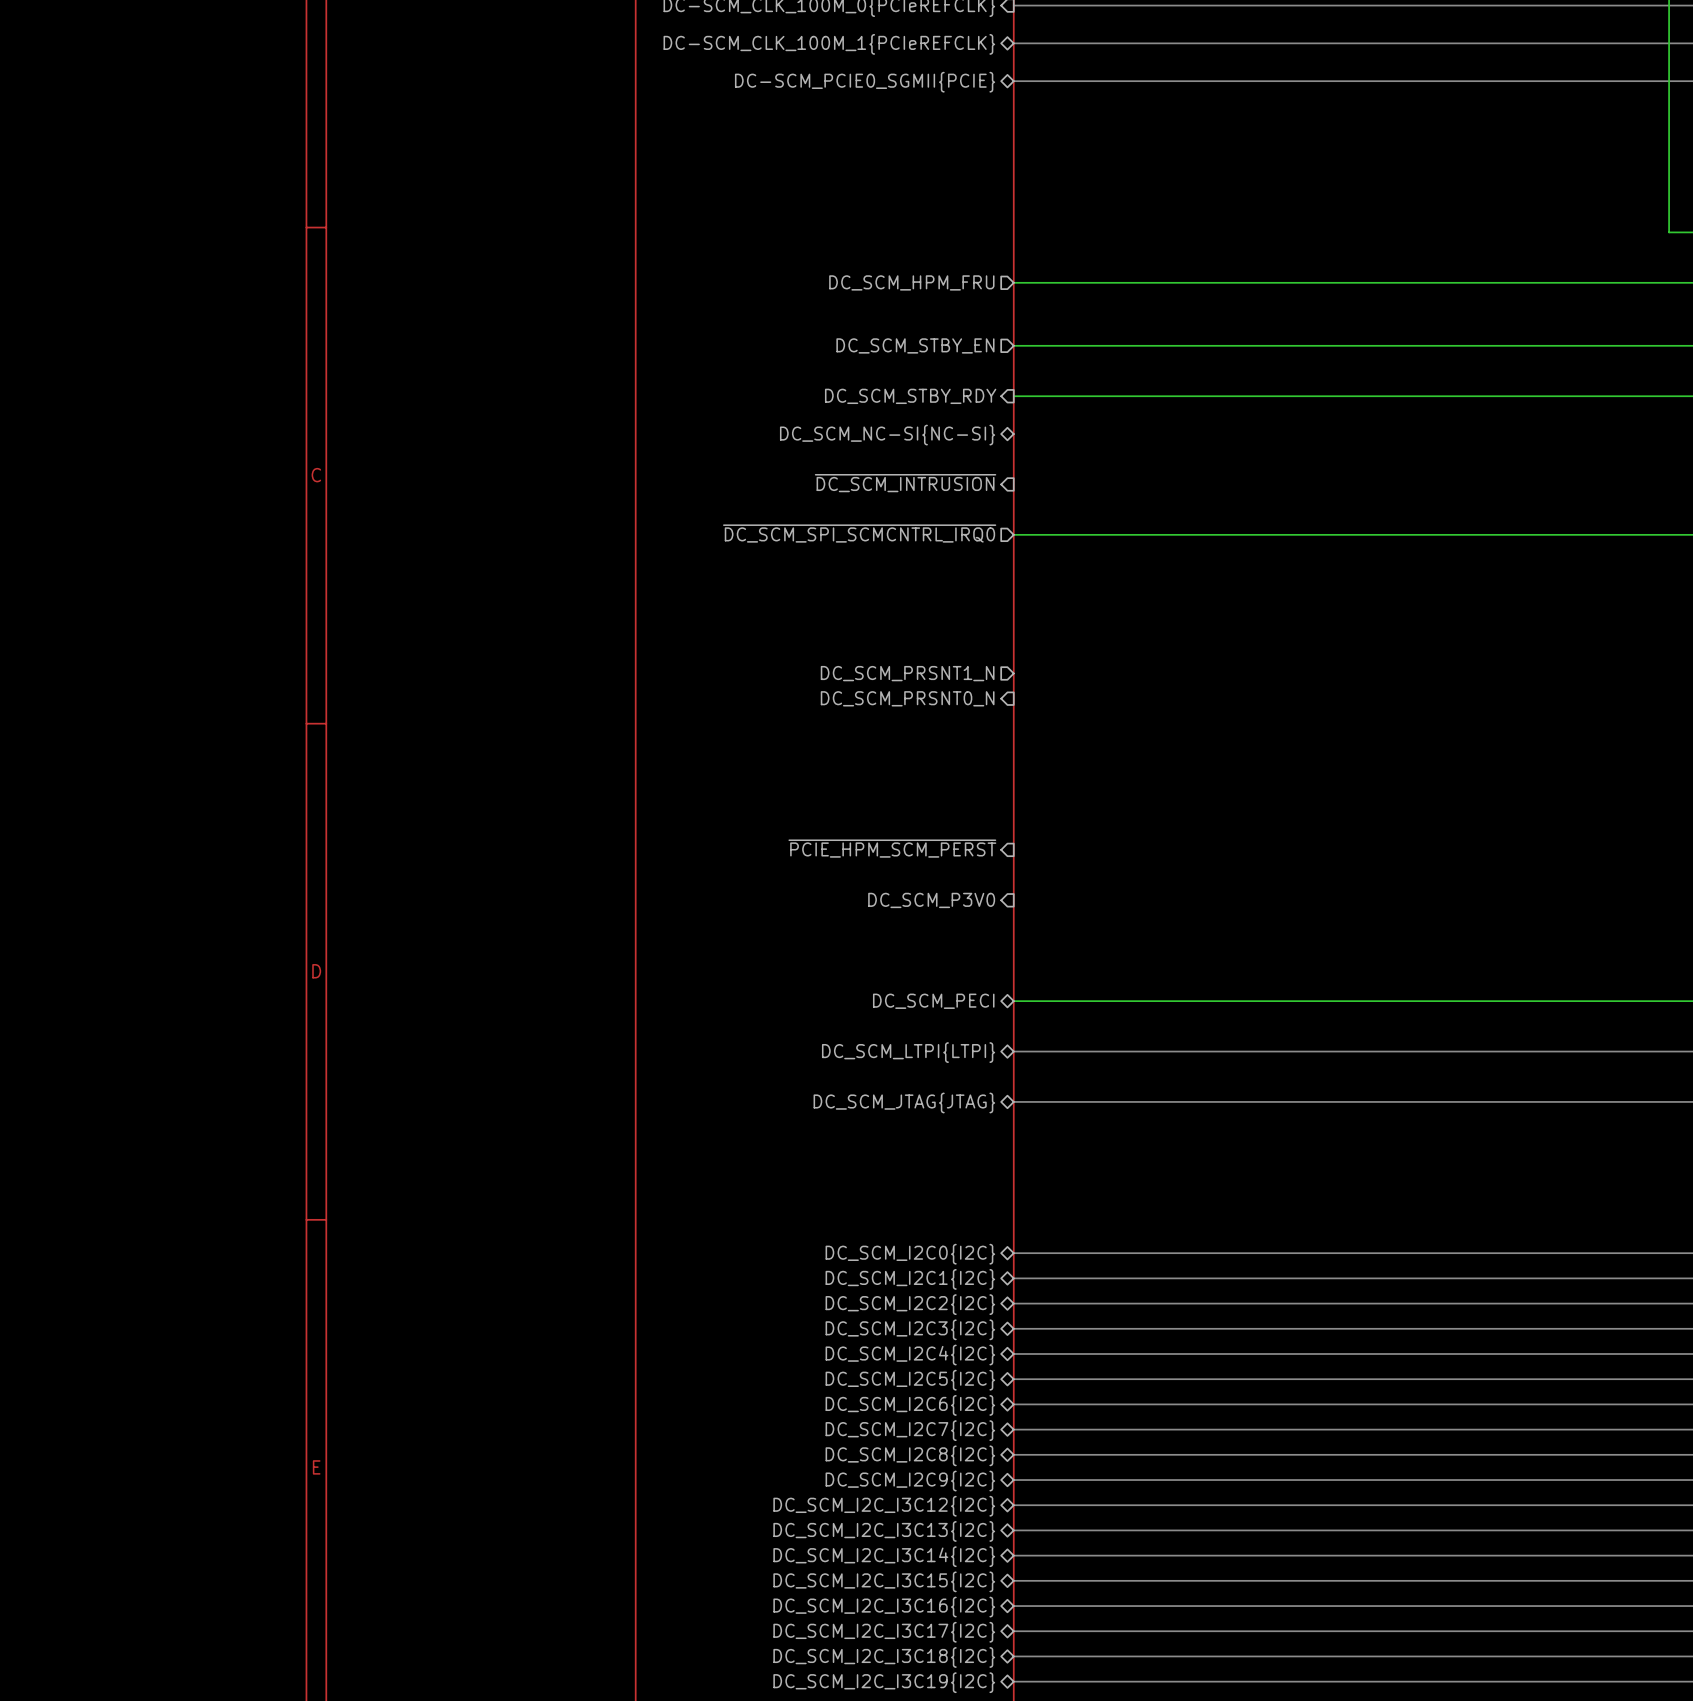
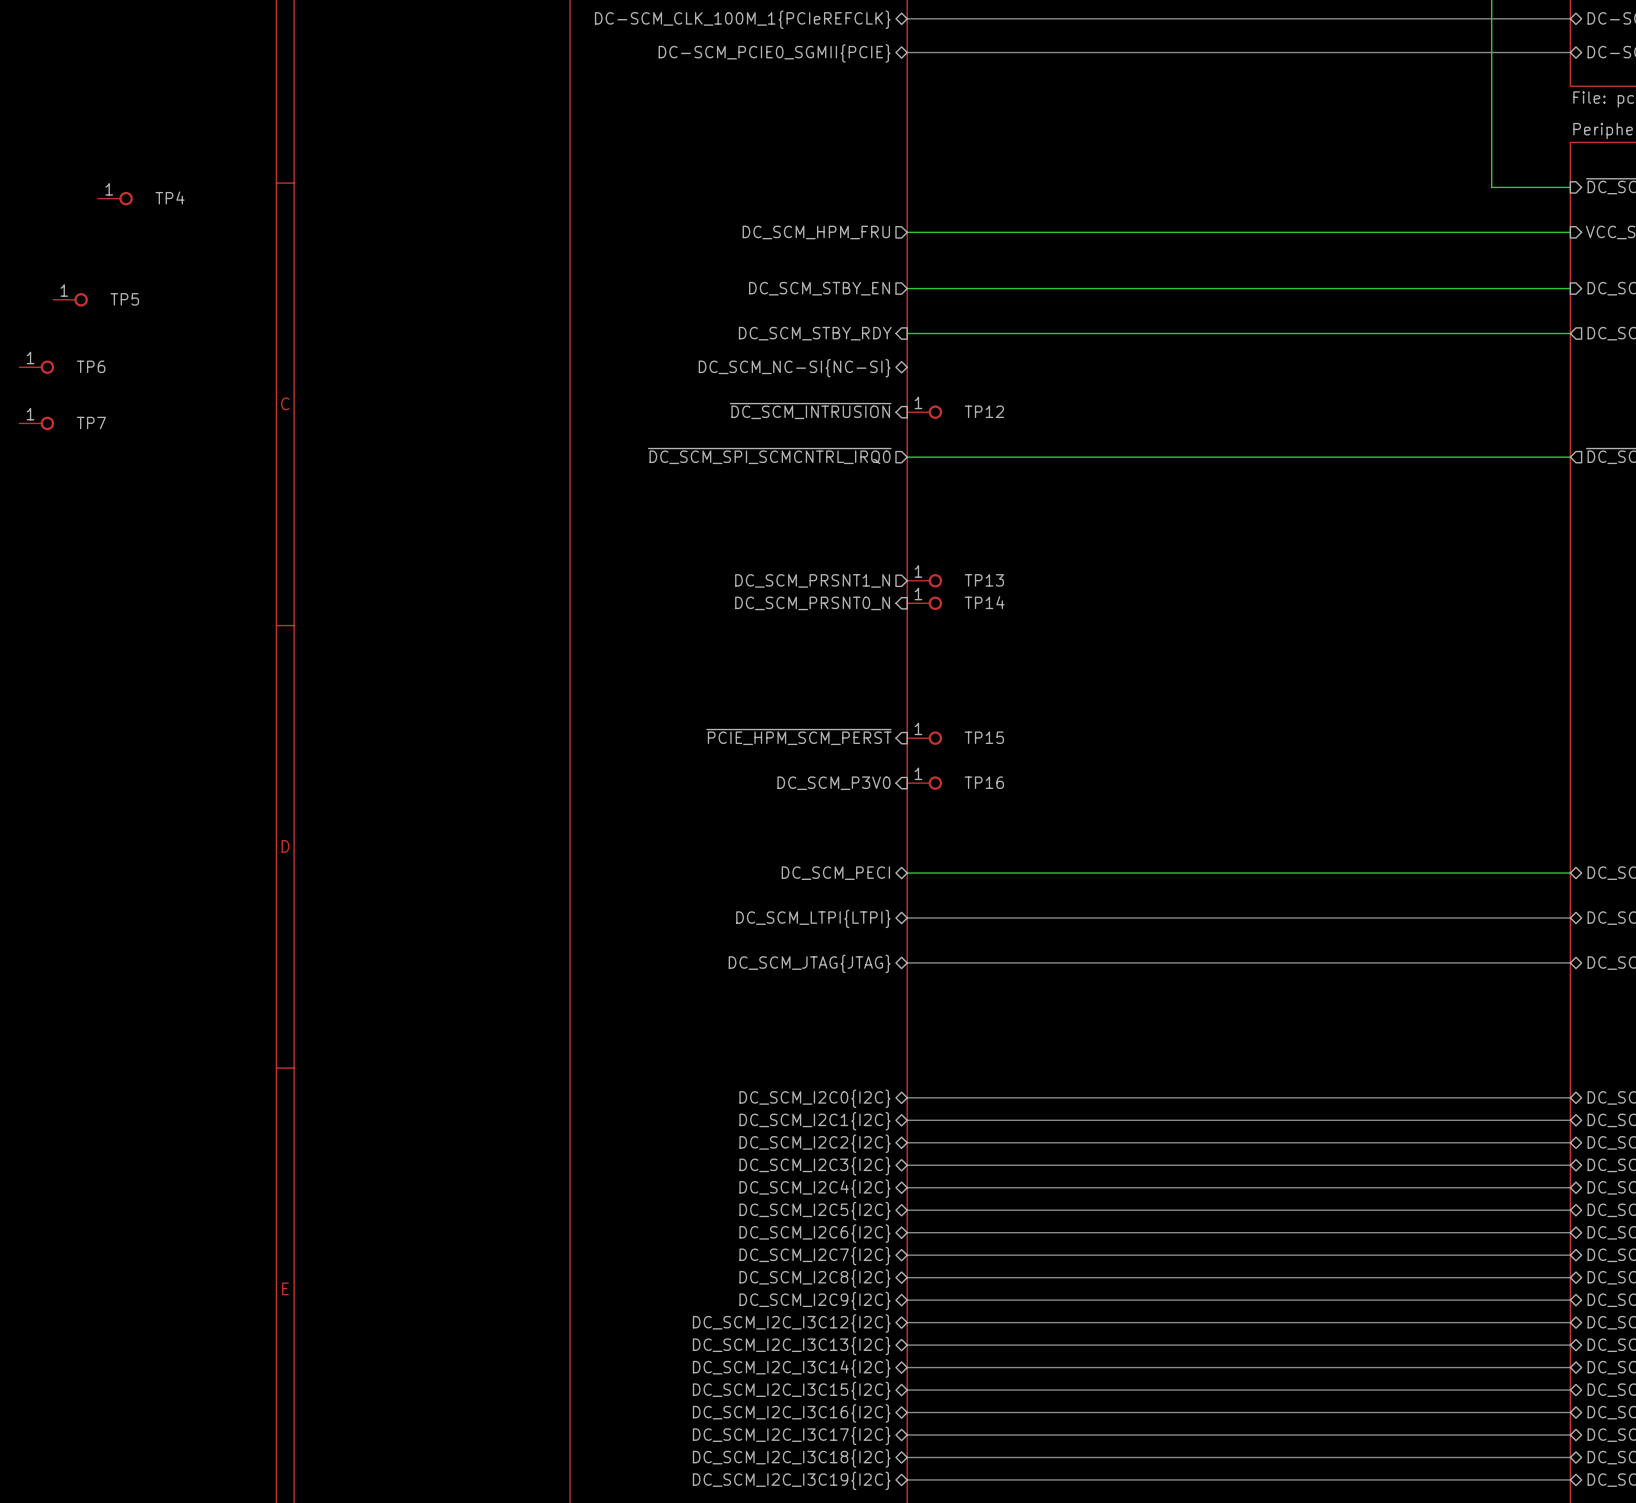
TP4: none -> (115, 198)
TP5: none -> (70, 299)
TP6: none -> (36, 367)
TP12: none -> (924, 412)
TP7: none -> (36, 423)
TP13: none -> (924, 580)
TP14: none -> (924, 603)
TP15: none -> (924, 738)
TP16: none -> (924, 783)

